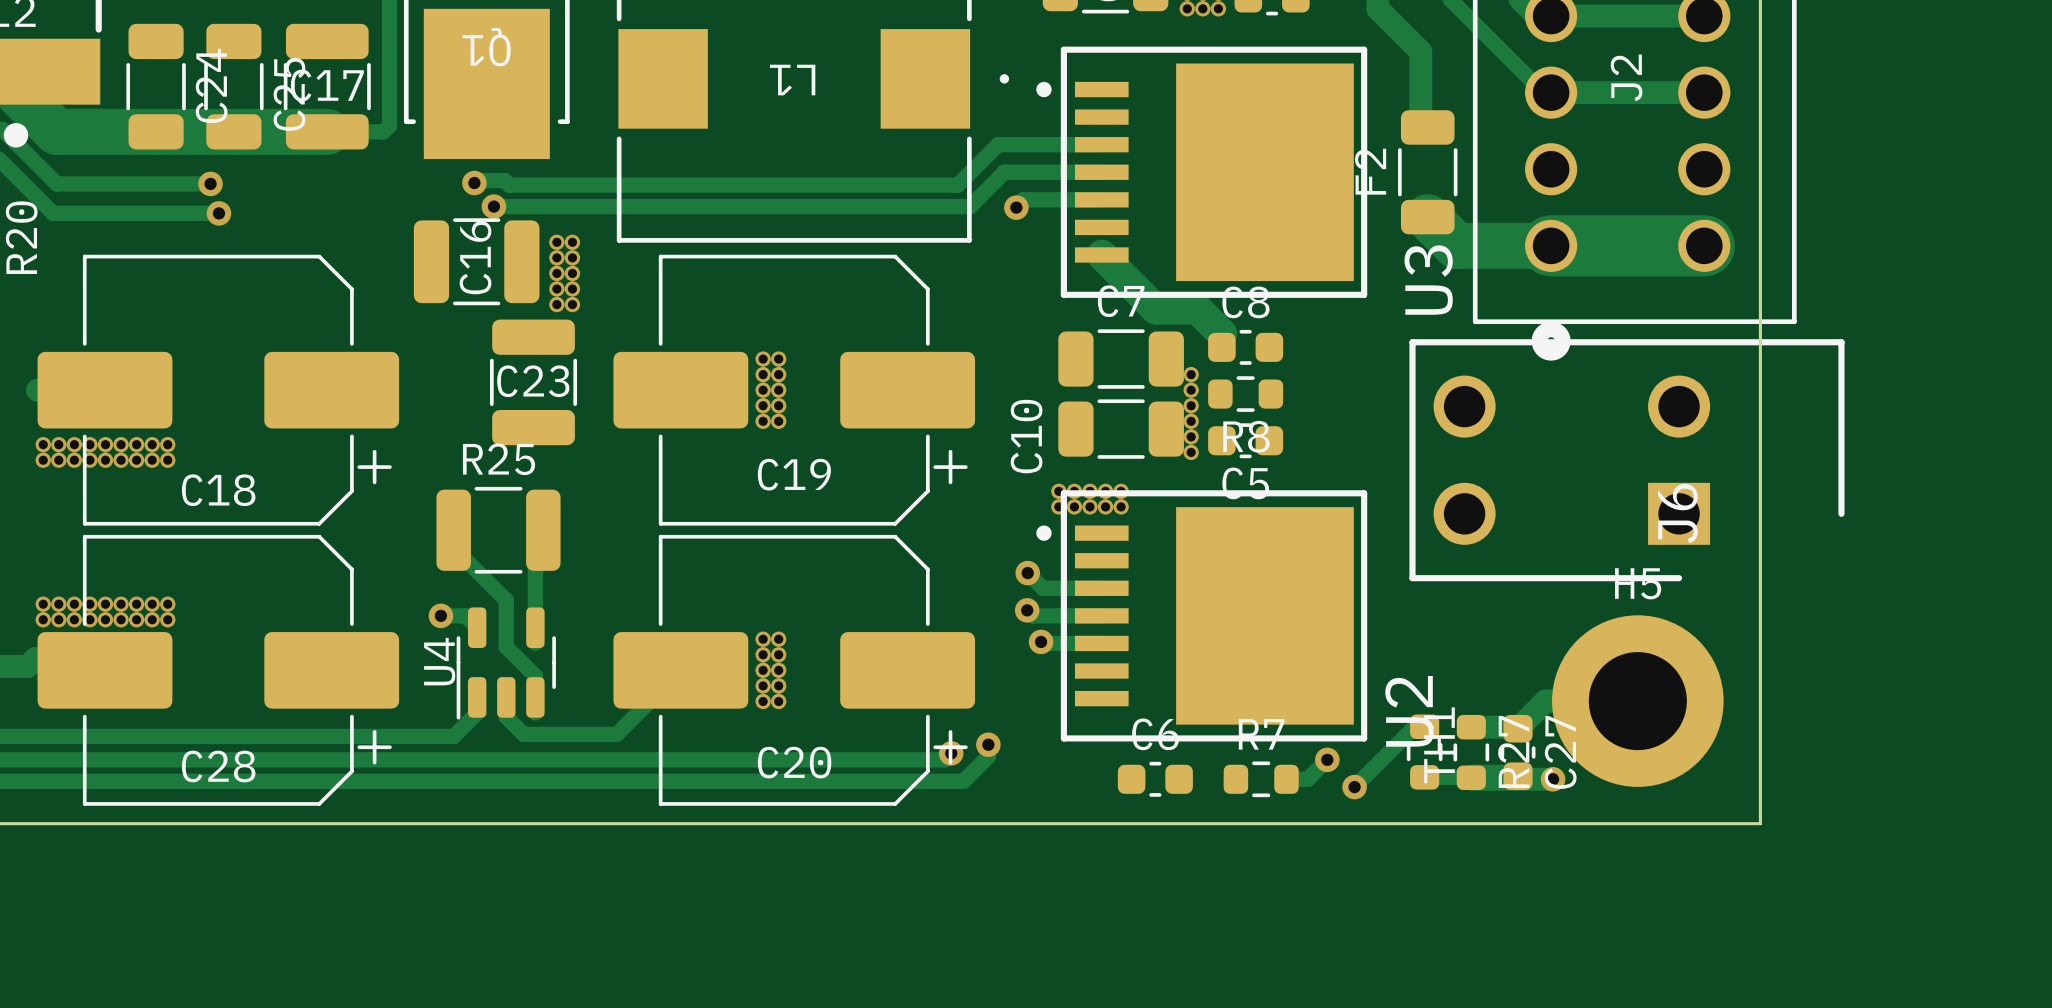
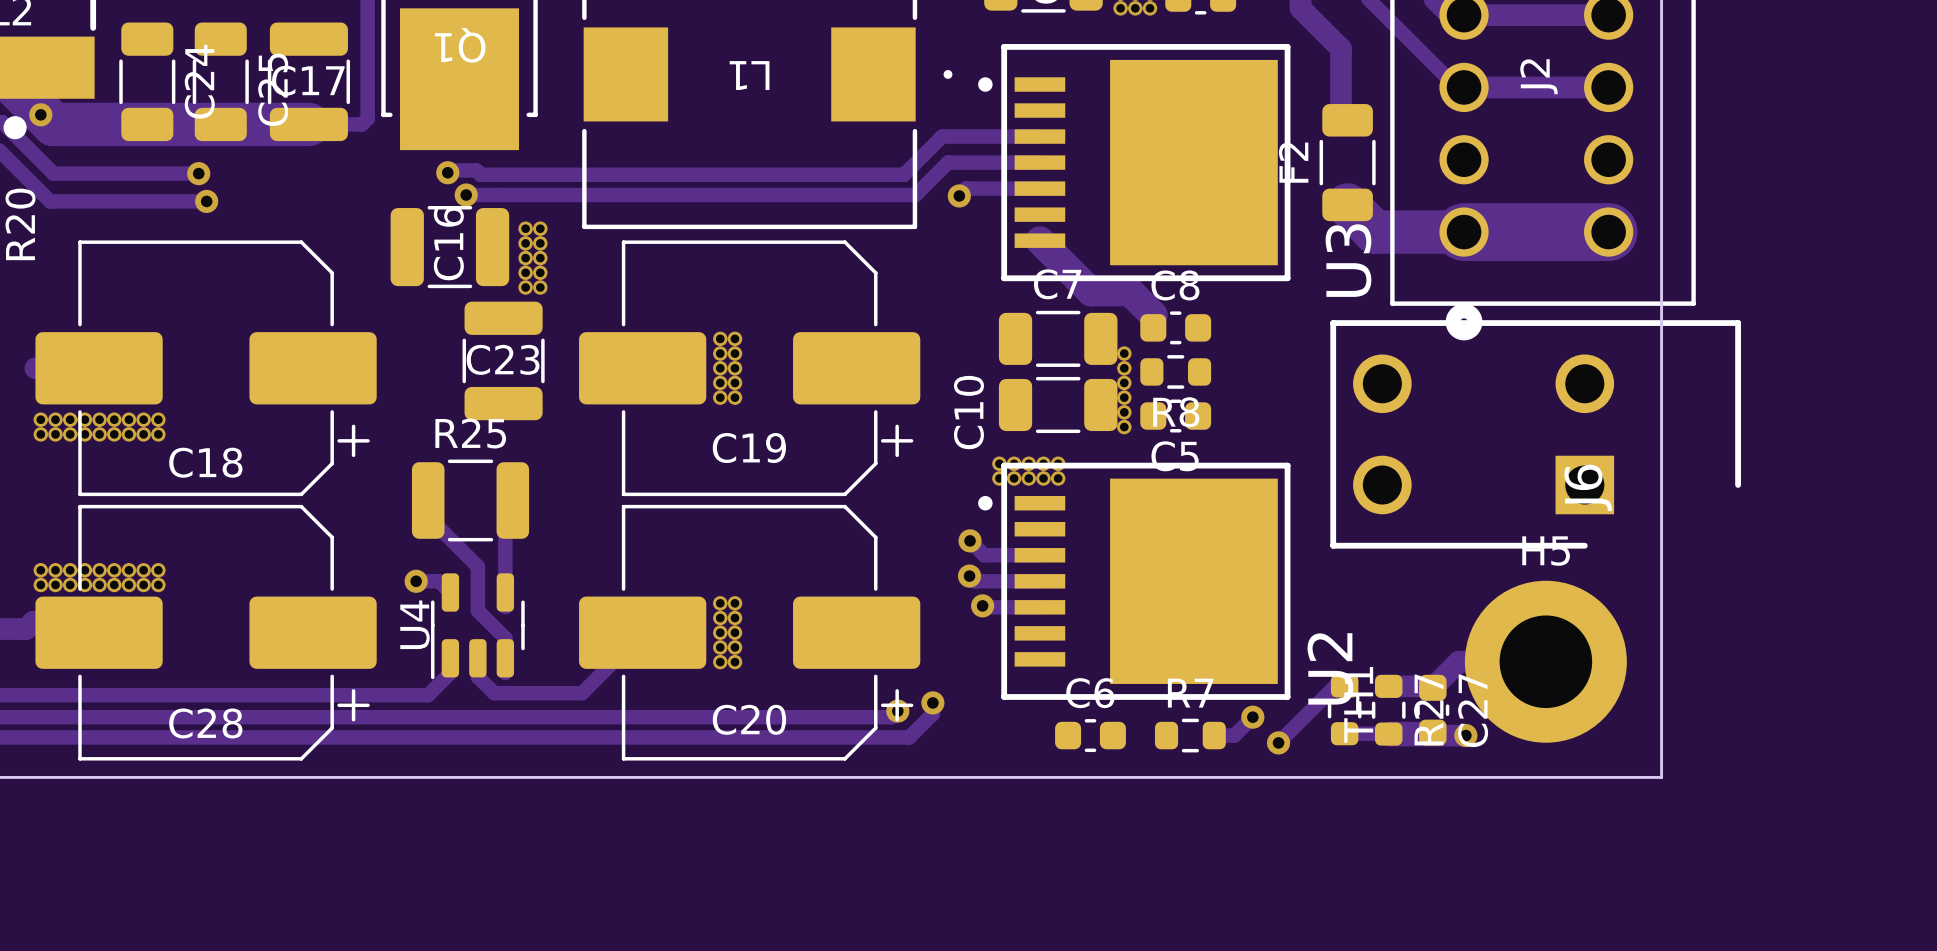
via: none -> (40, 114)

